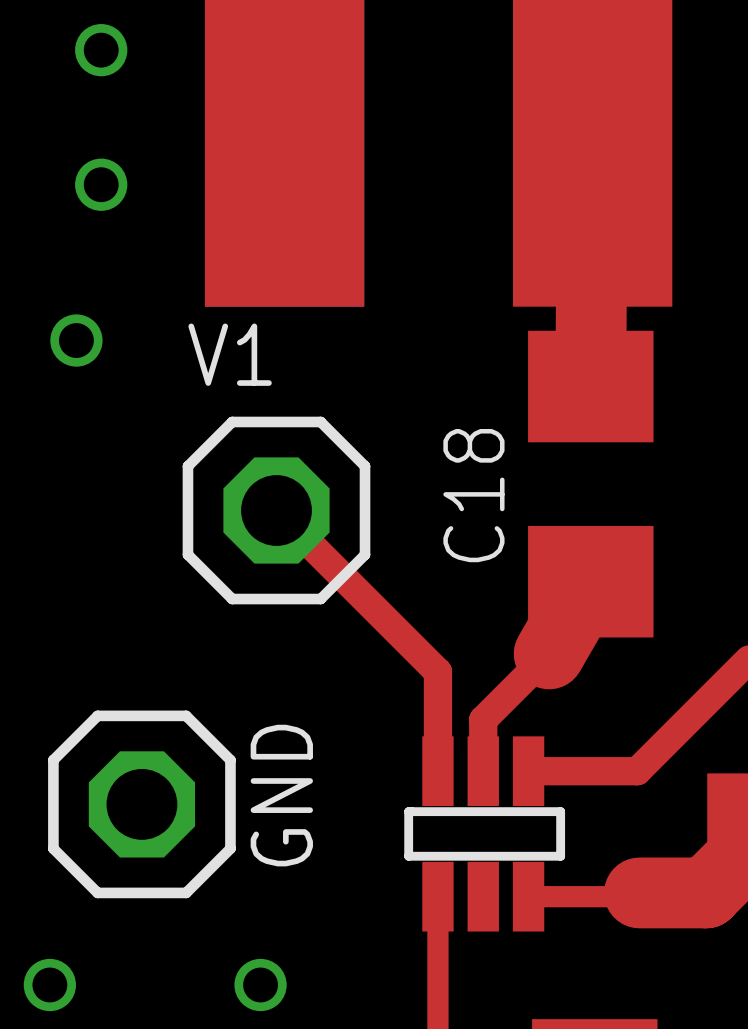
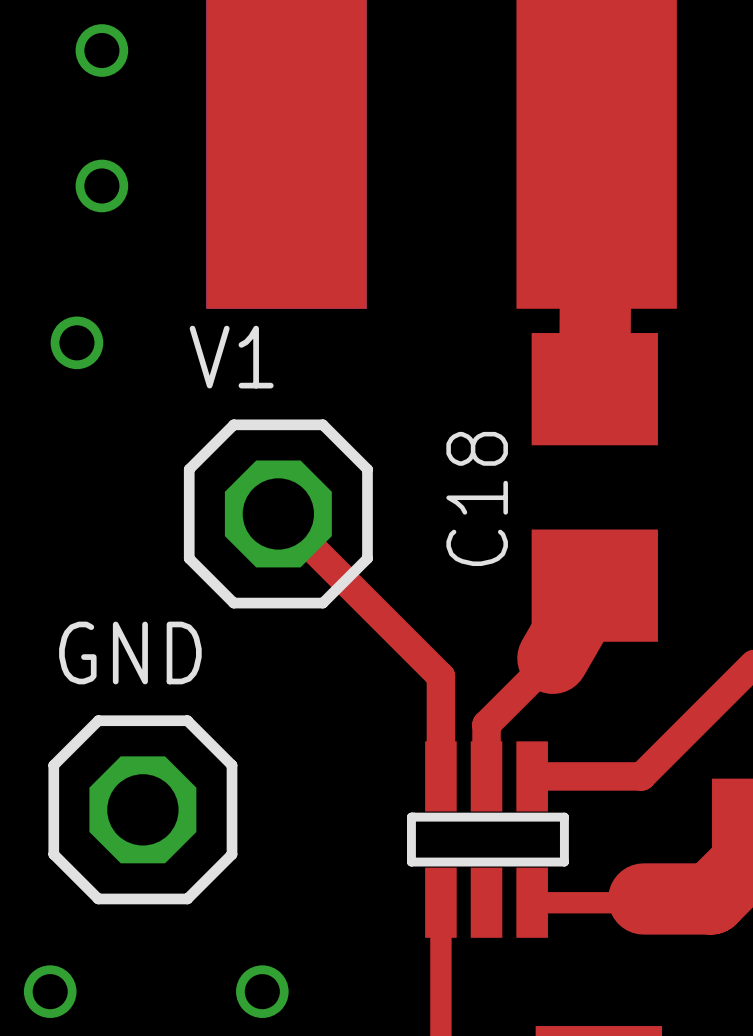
GND name rotation: 0° (281, 795) -> 90° clockwise (130, 652)

